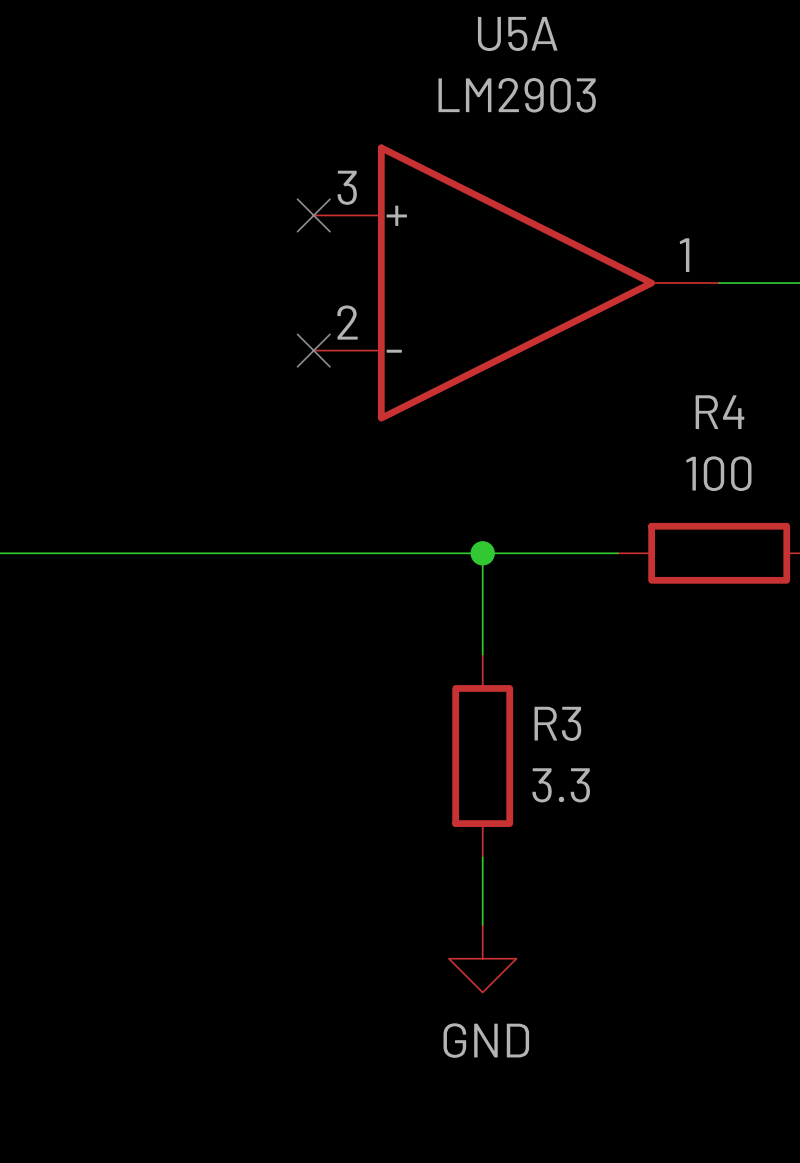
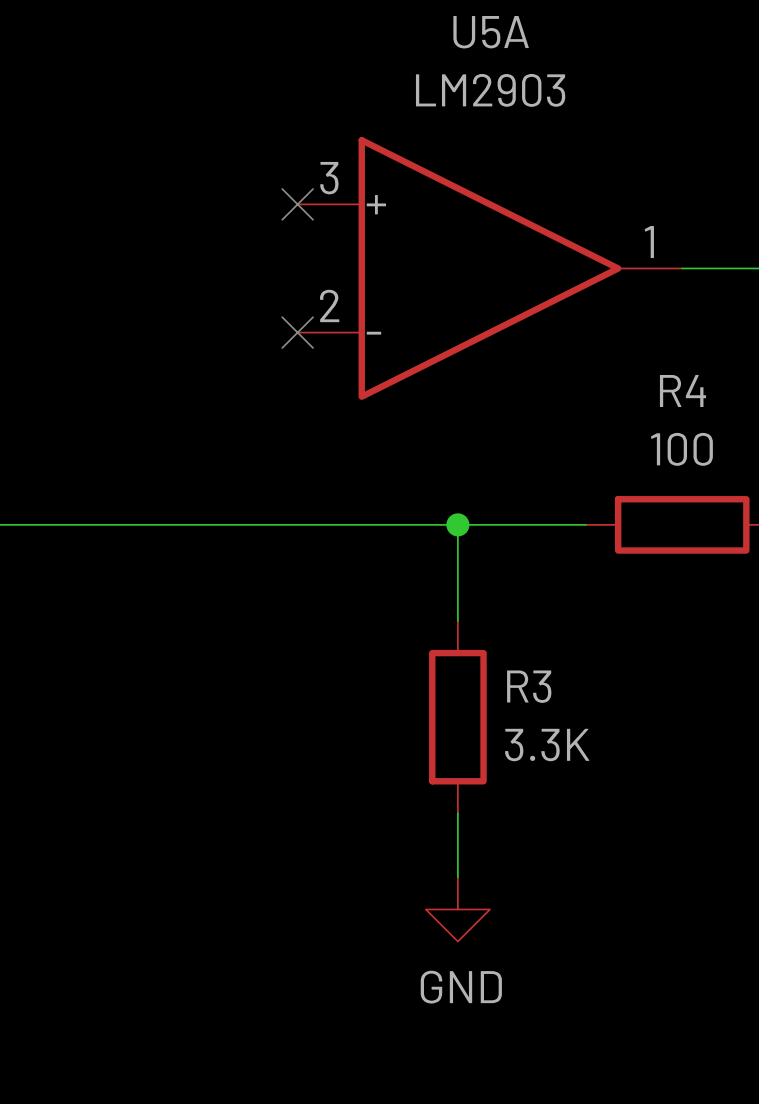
R3 value: 3.3 (561, 785) -> 3.3K (547, 745)

